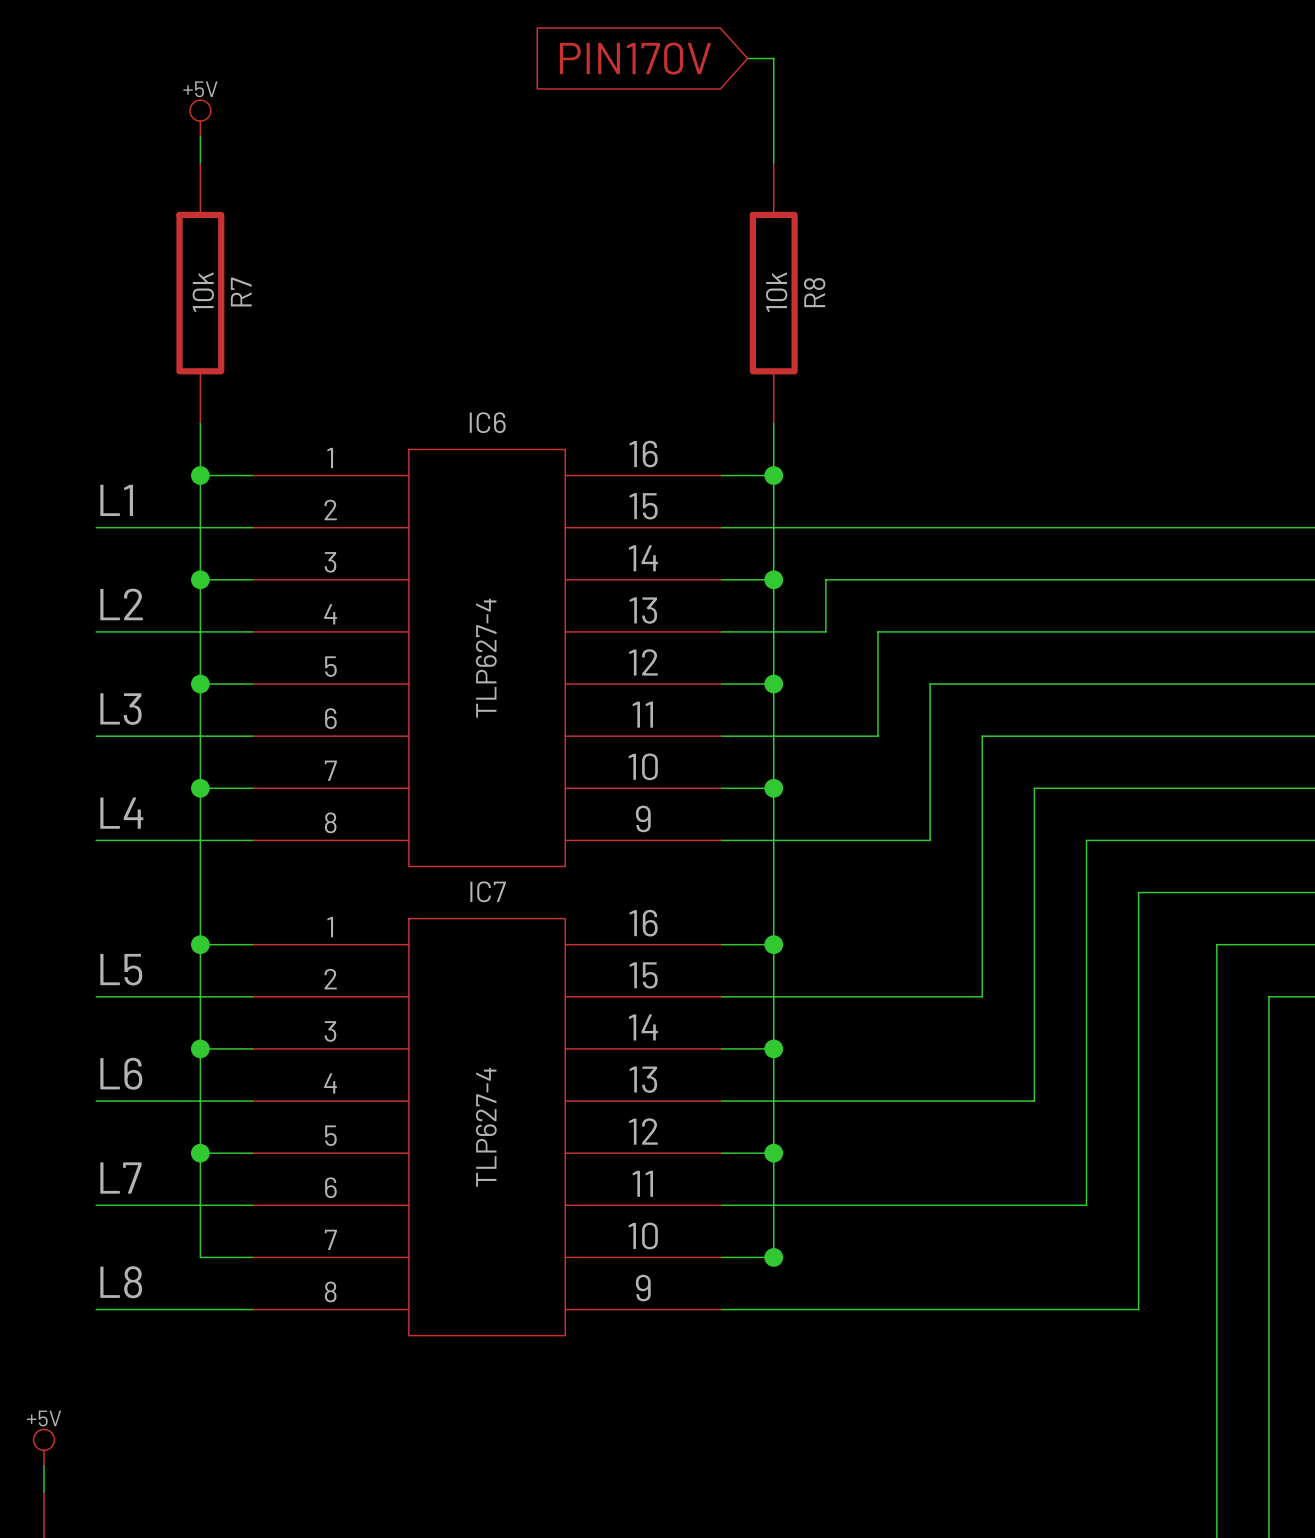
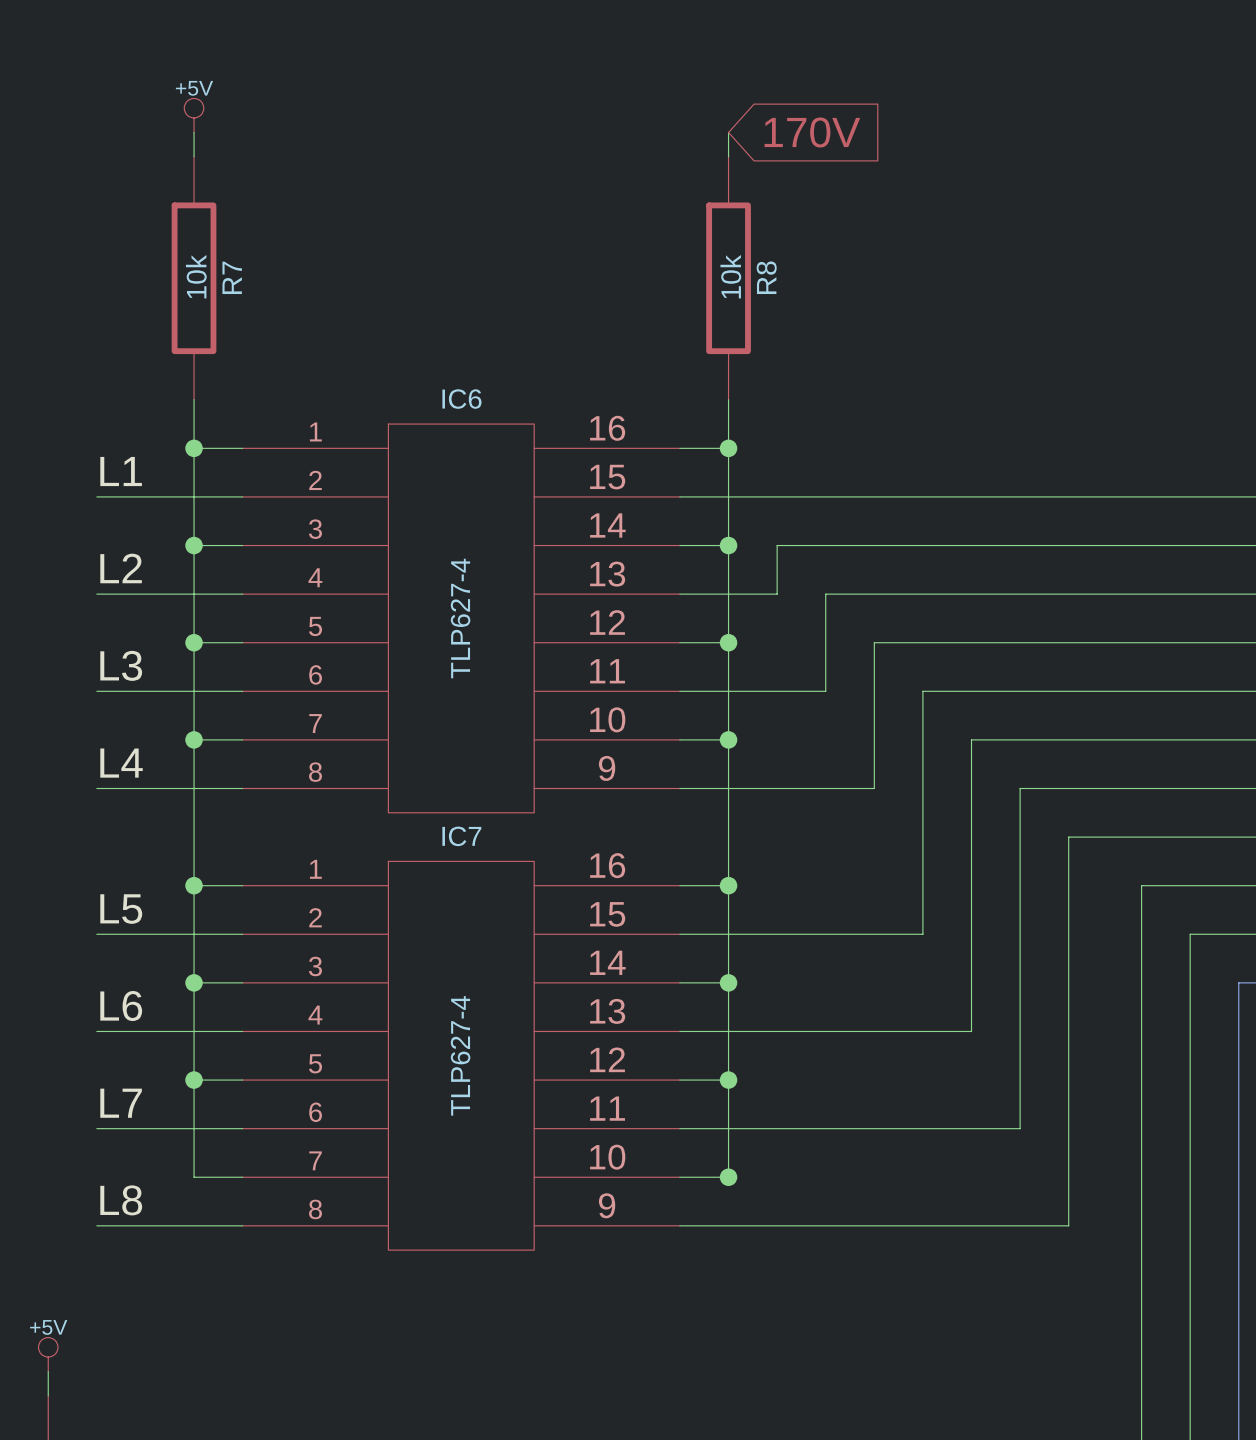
global label: PIN170V (635, 58) -> none
wire: (747, 58) (773, 58) (773, 136) -> none
global label: none -> 170V (812, 132)

